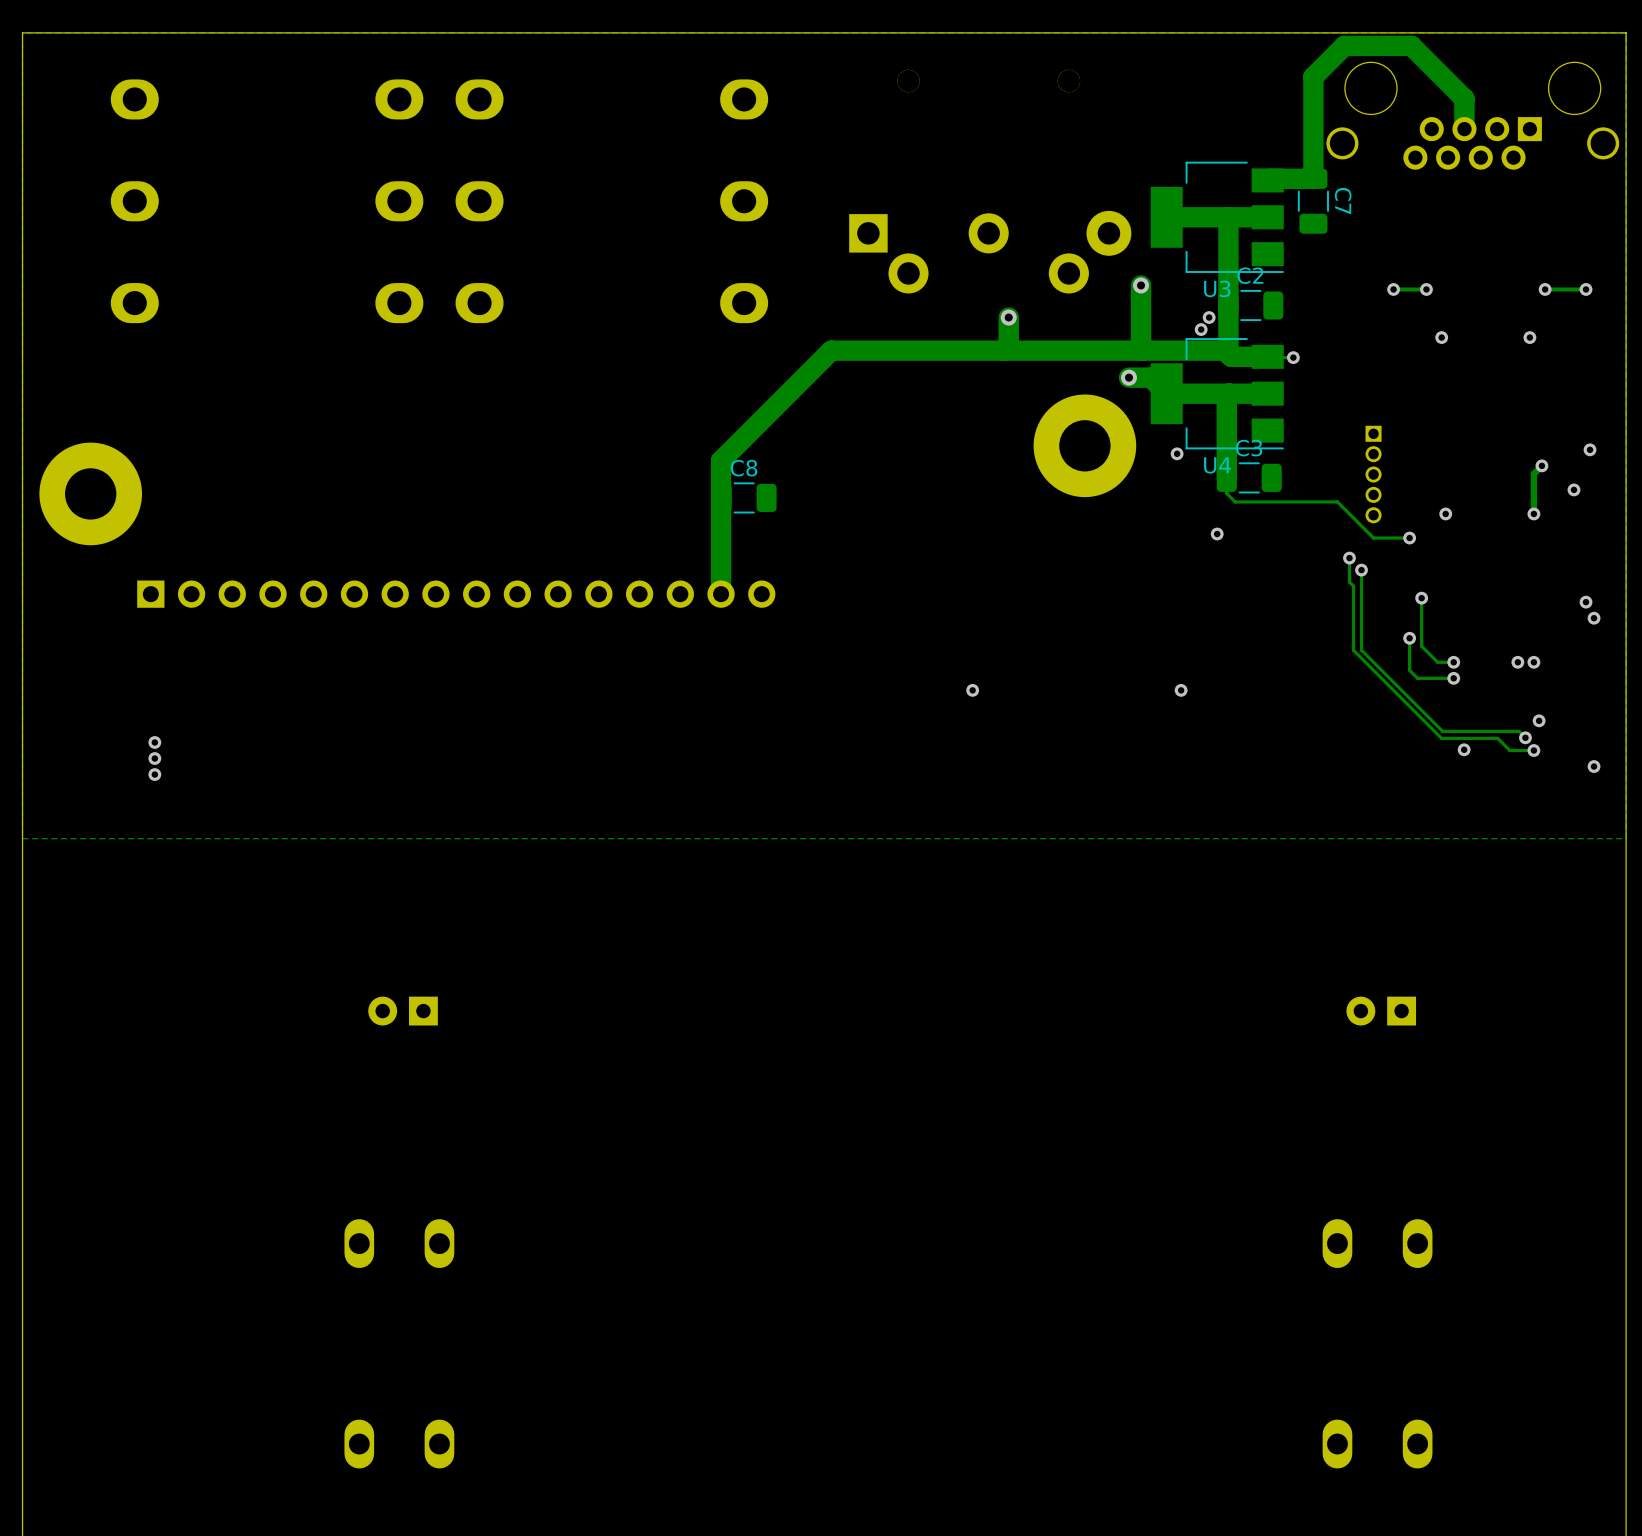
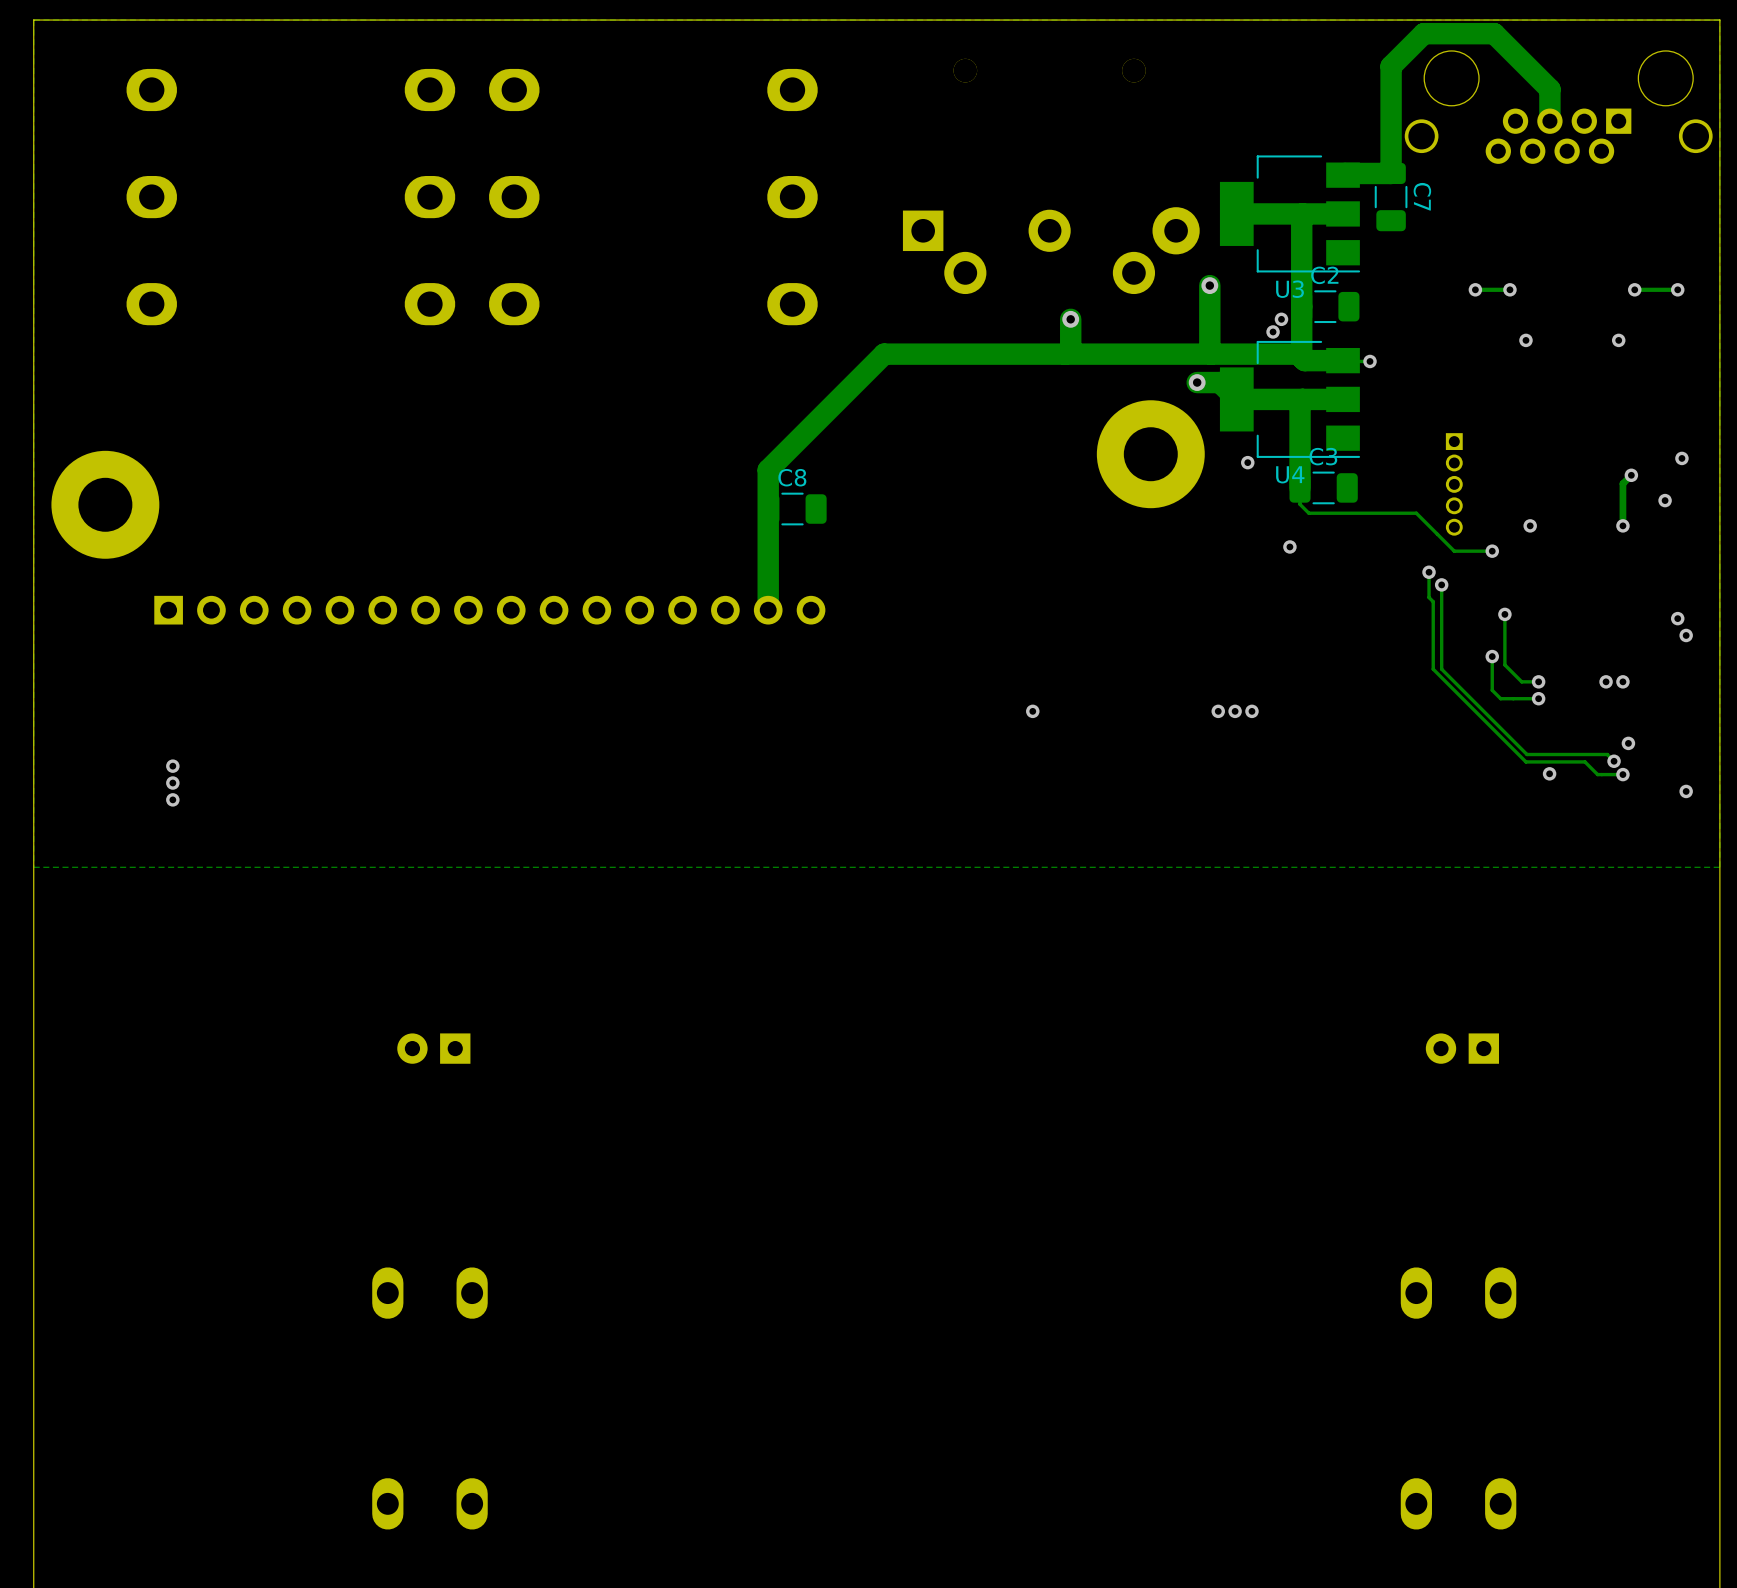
via: none -> (1218, 711)
via: none -> (1235, 711)

